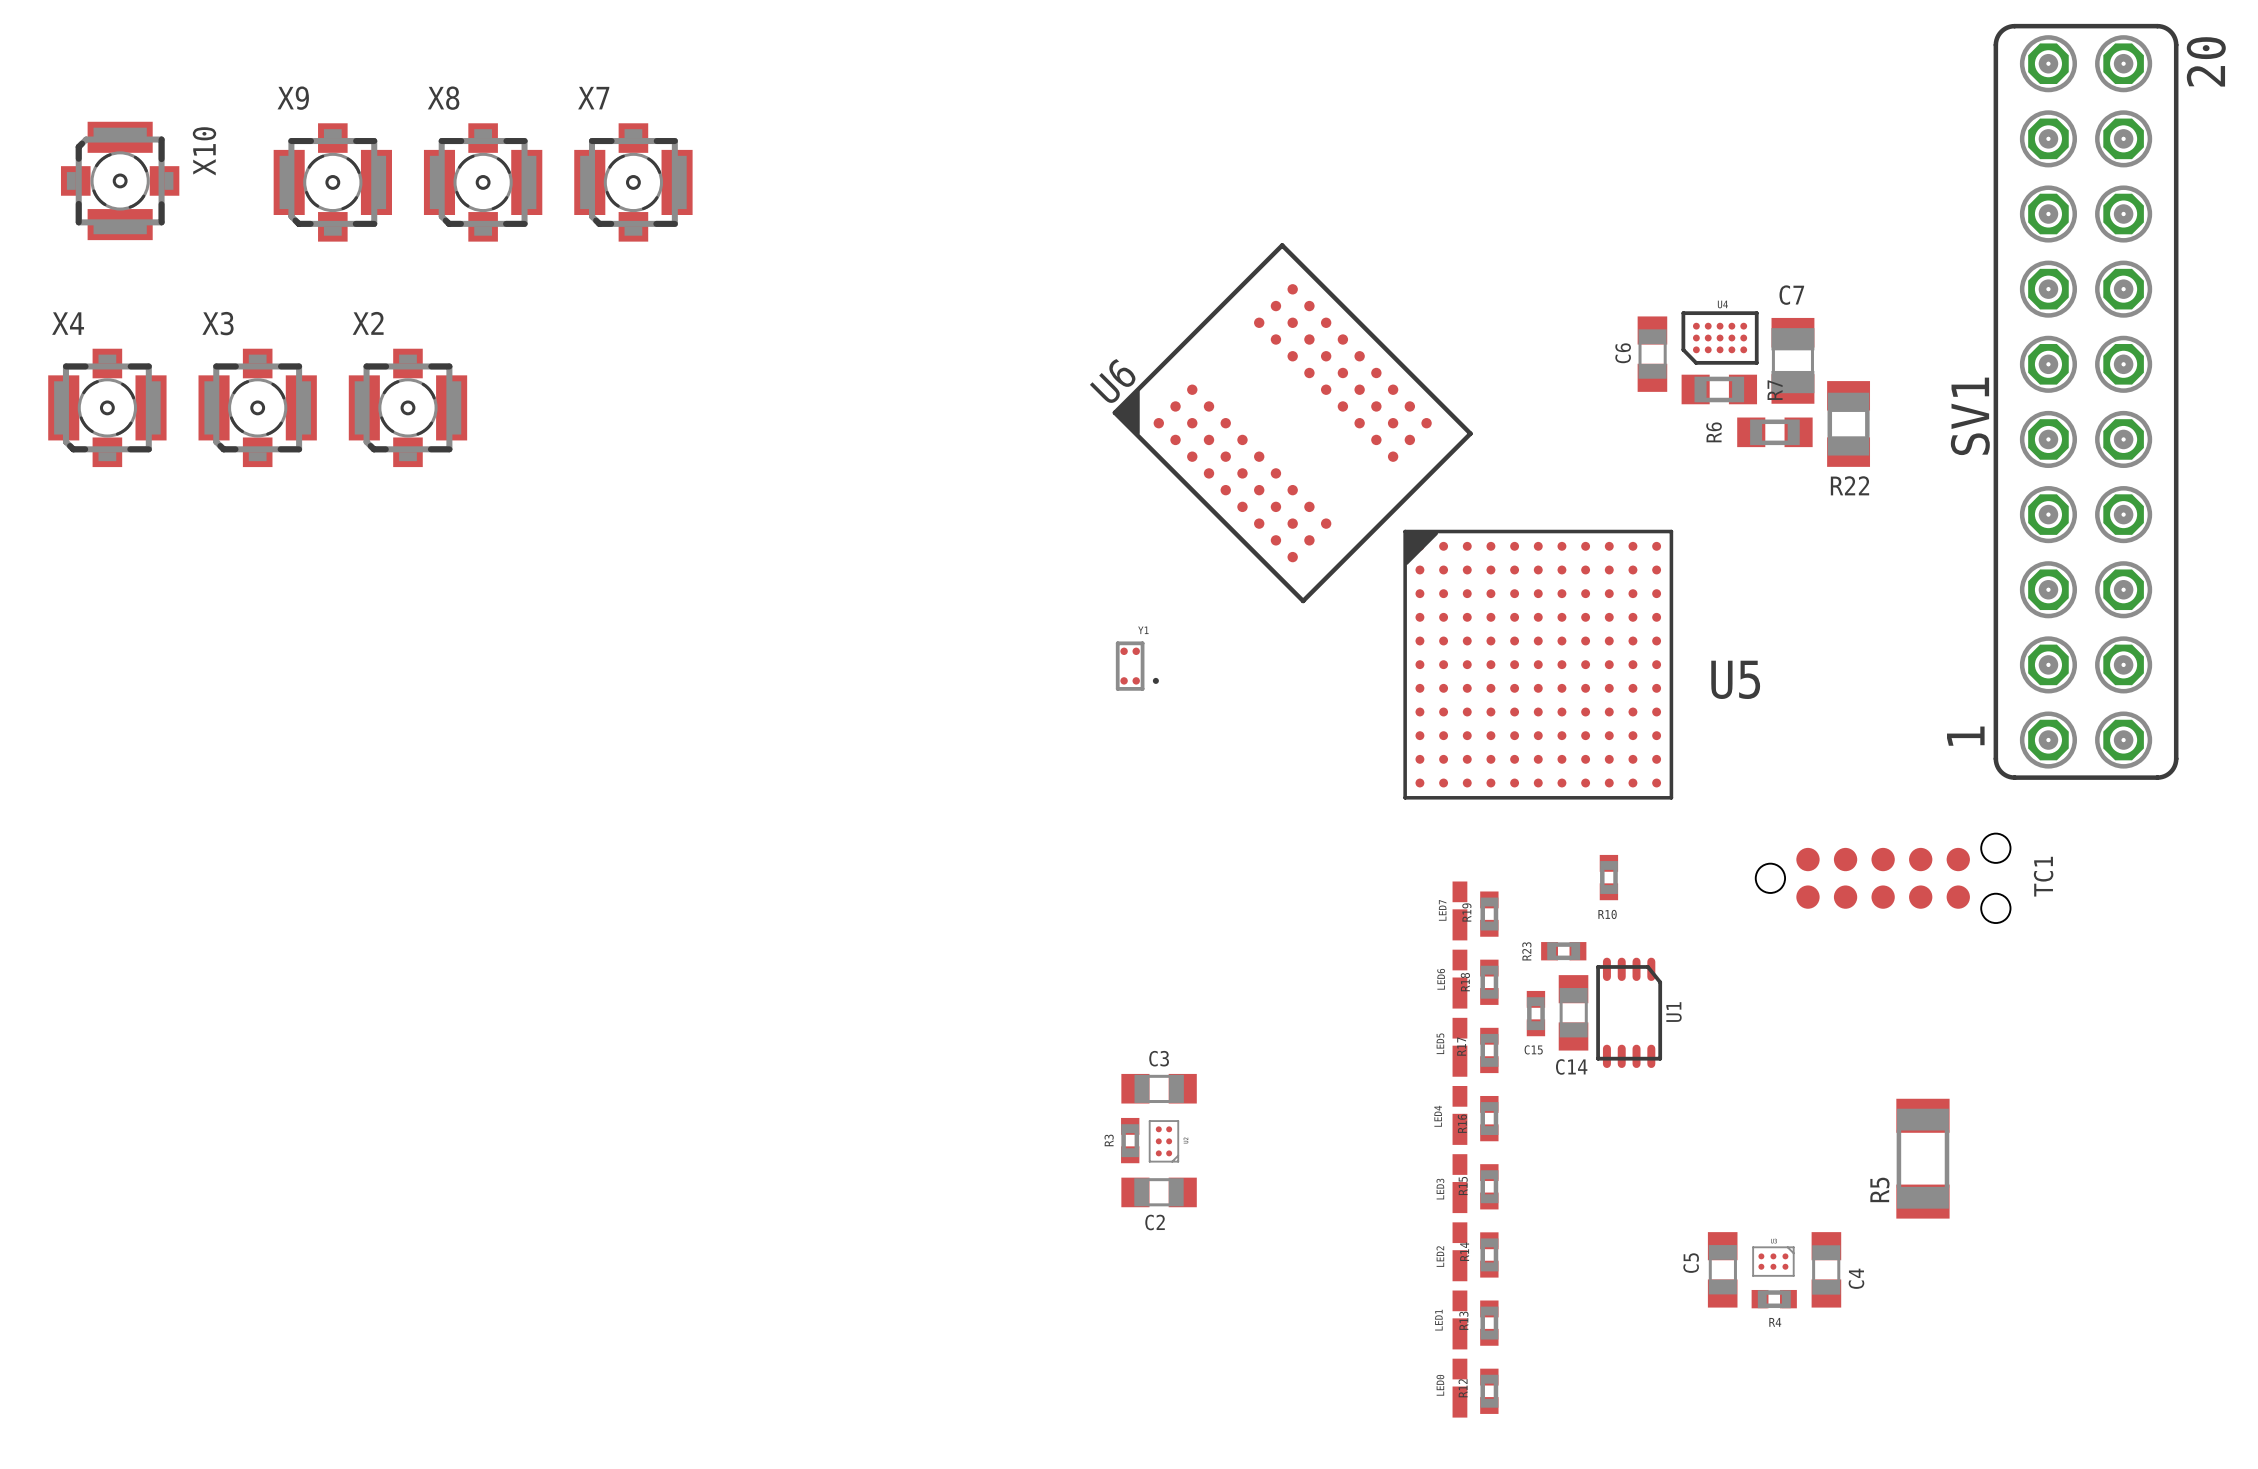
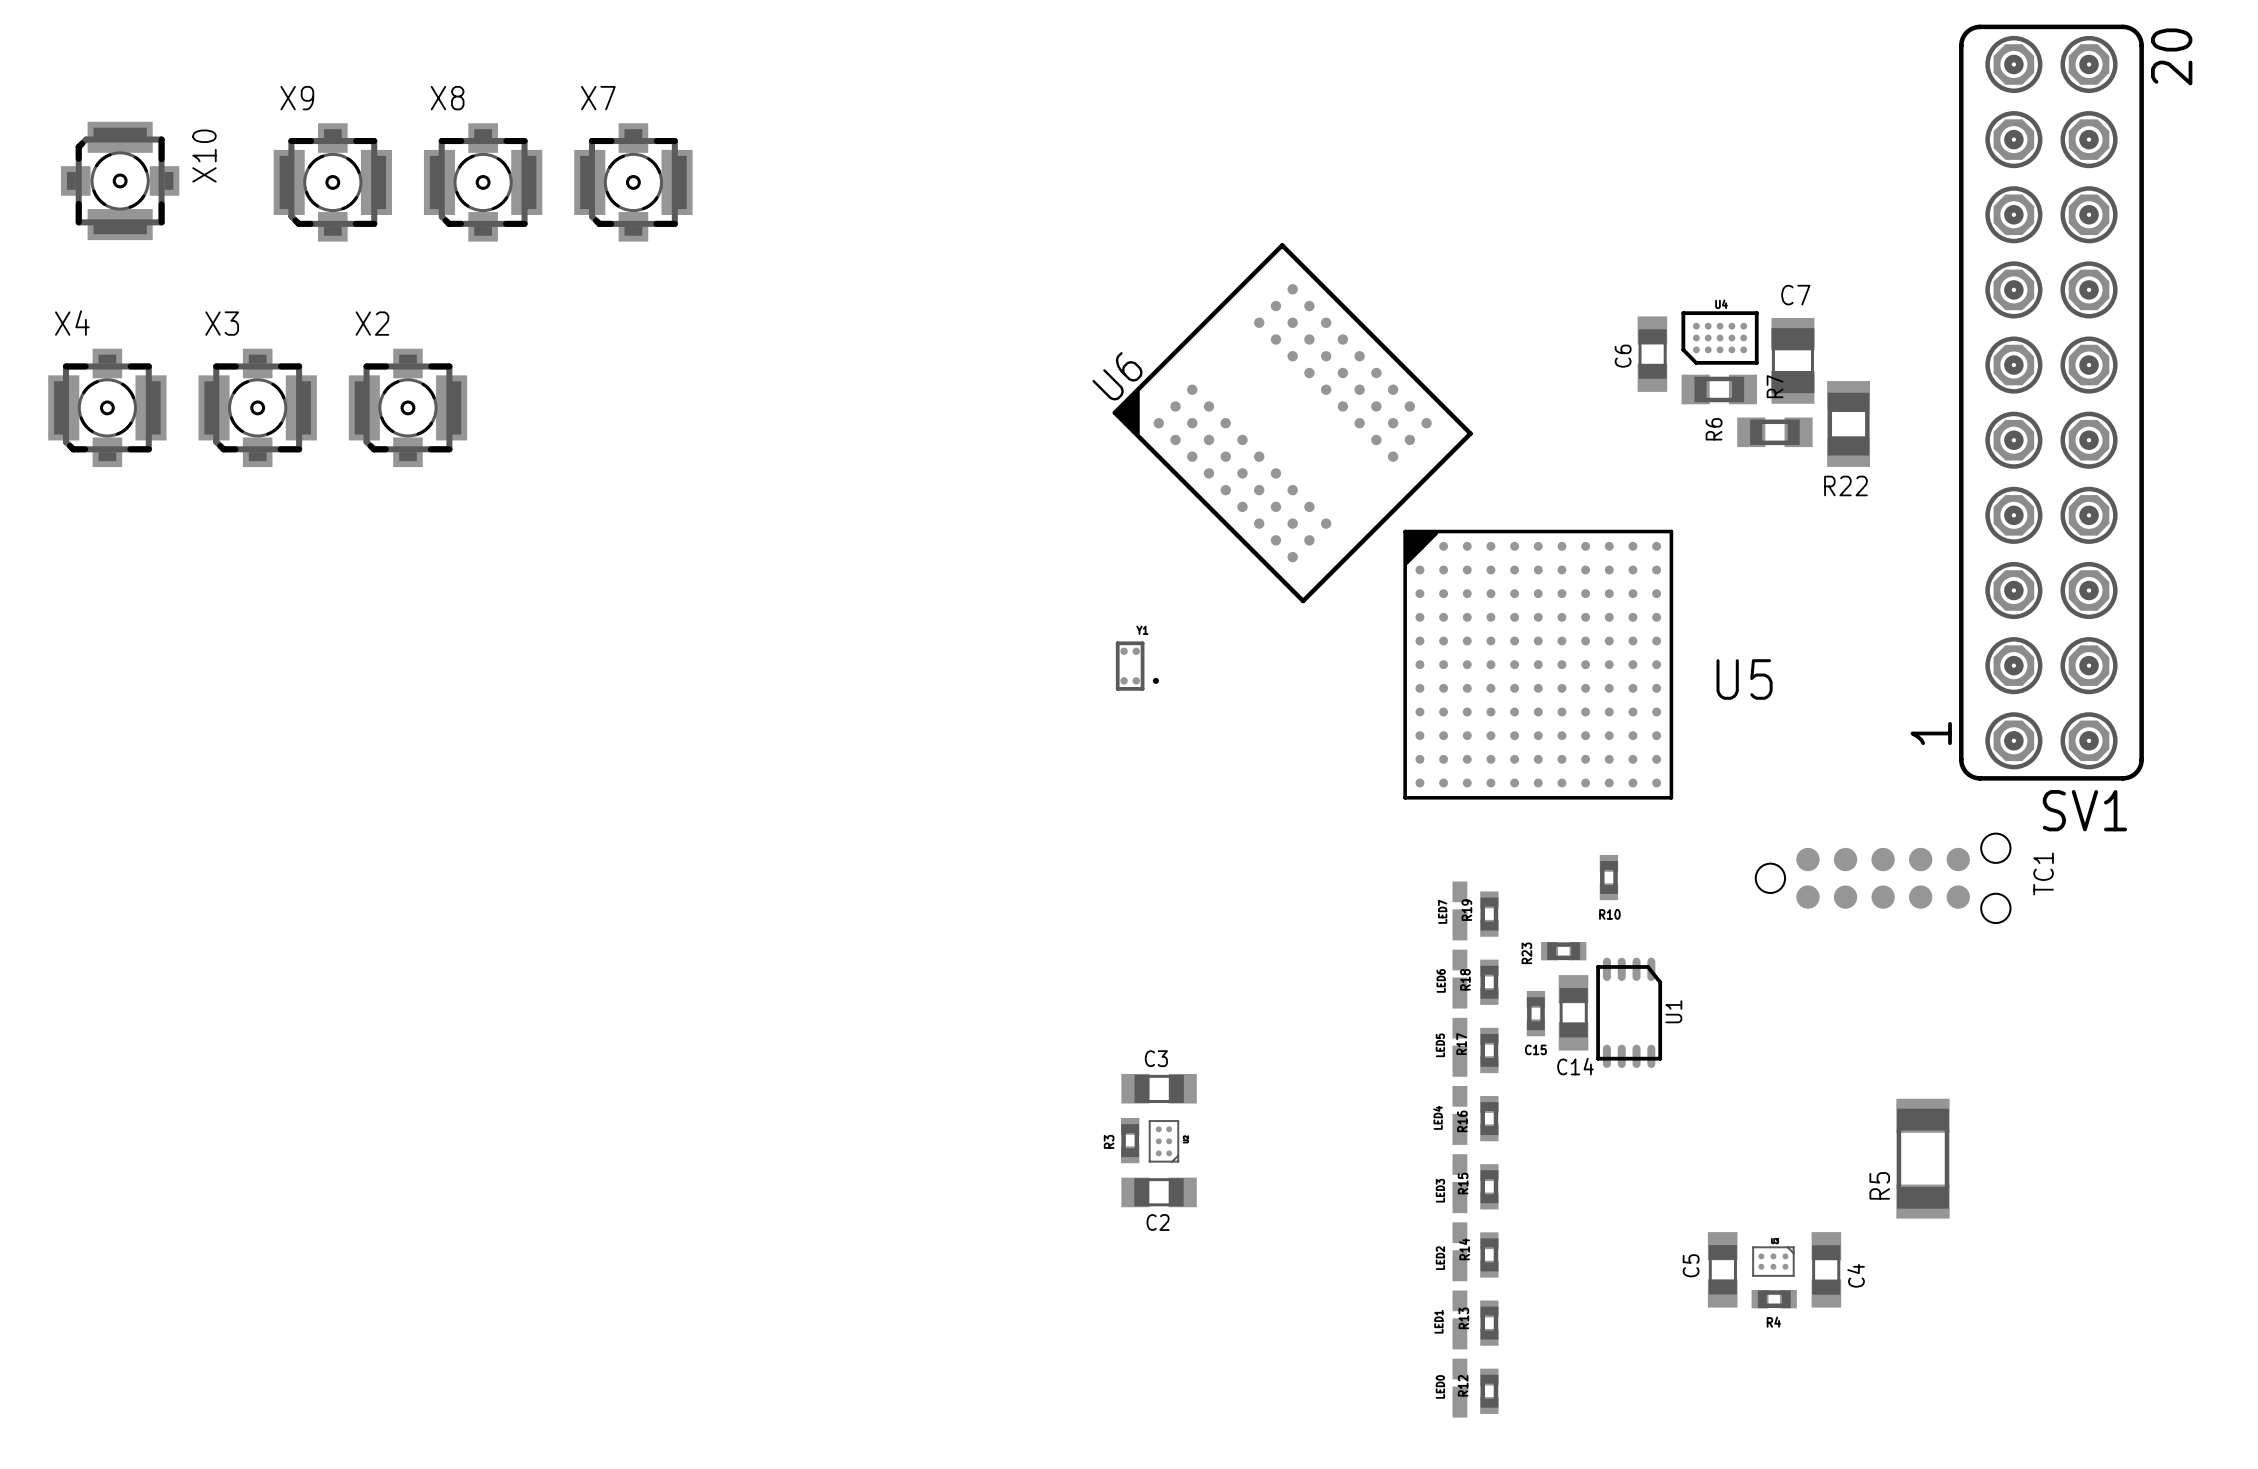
SV1 position: (2086, 401) -> (2051, 402)
SV1 name rotation: 0° (1970, 416) -> 90° clockwise (2084, 810)
SV1 name position: SV1 (1970, 416) -> SV1 (2084, 810)

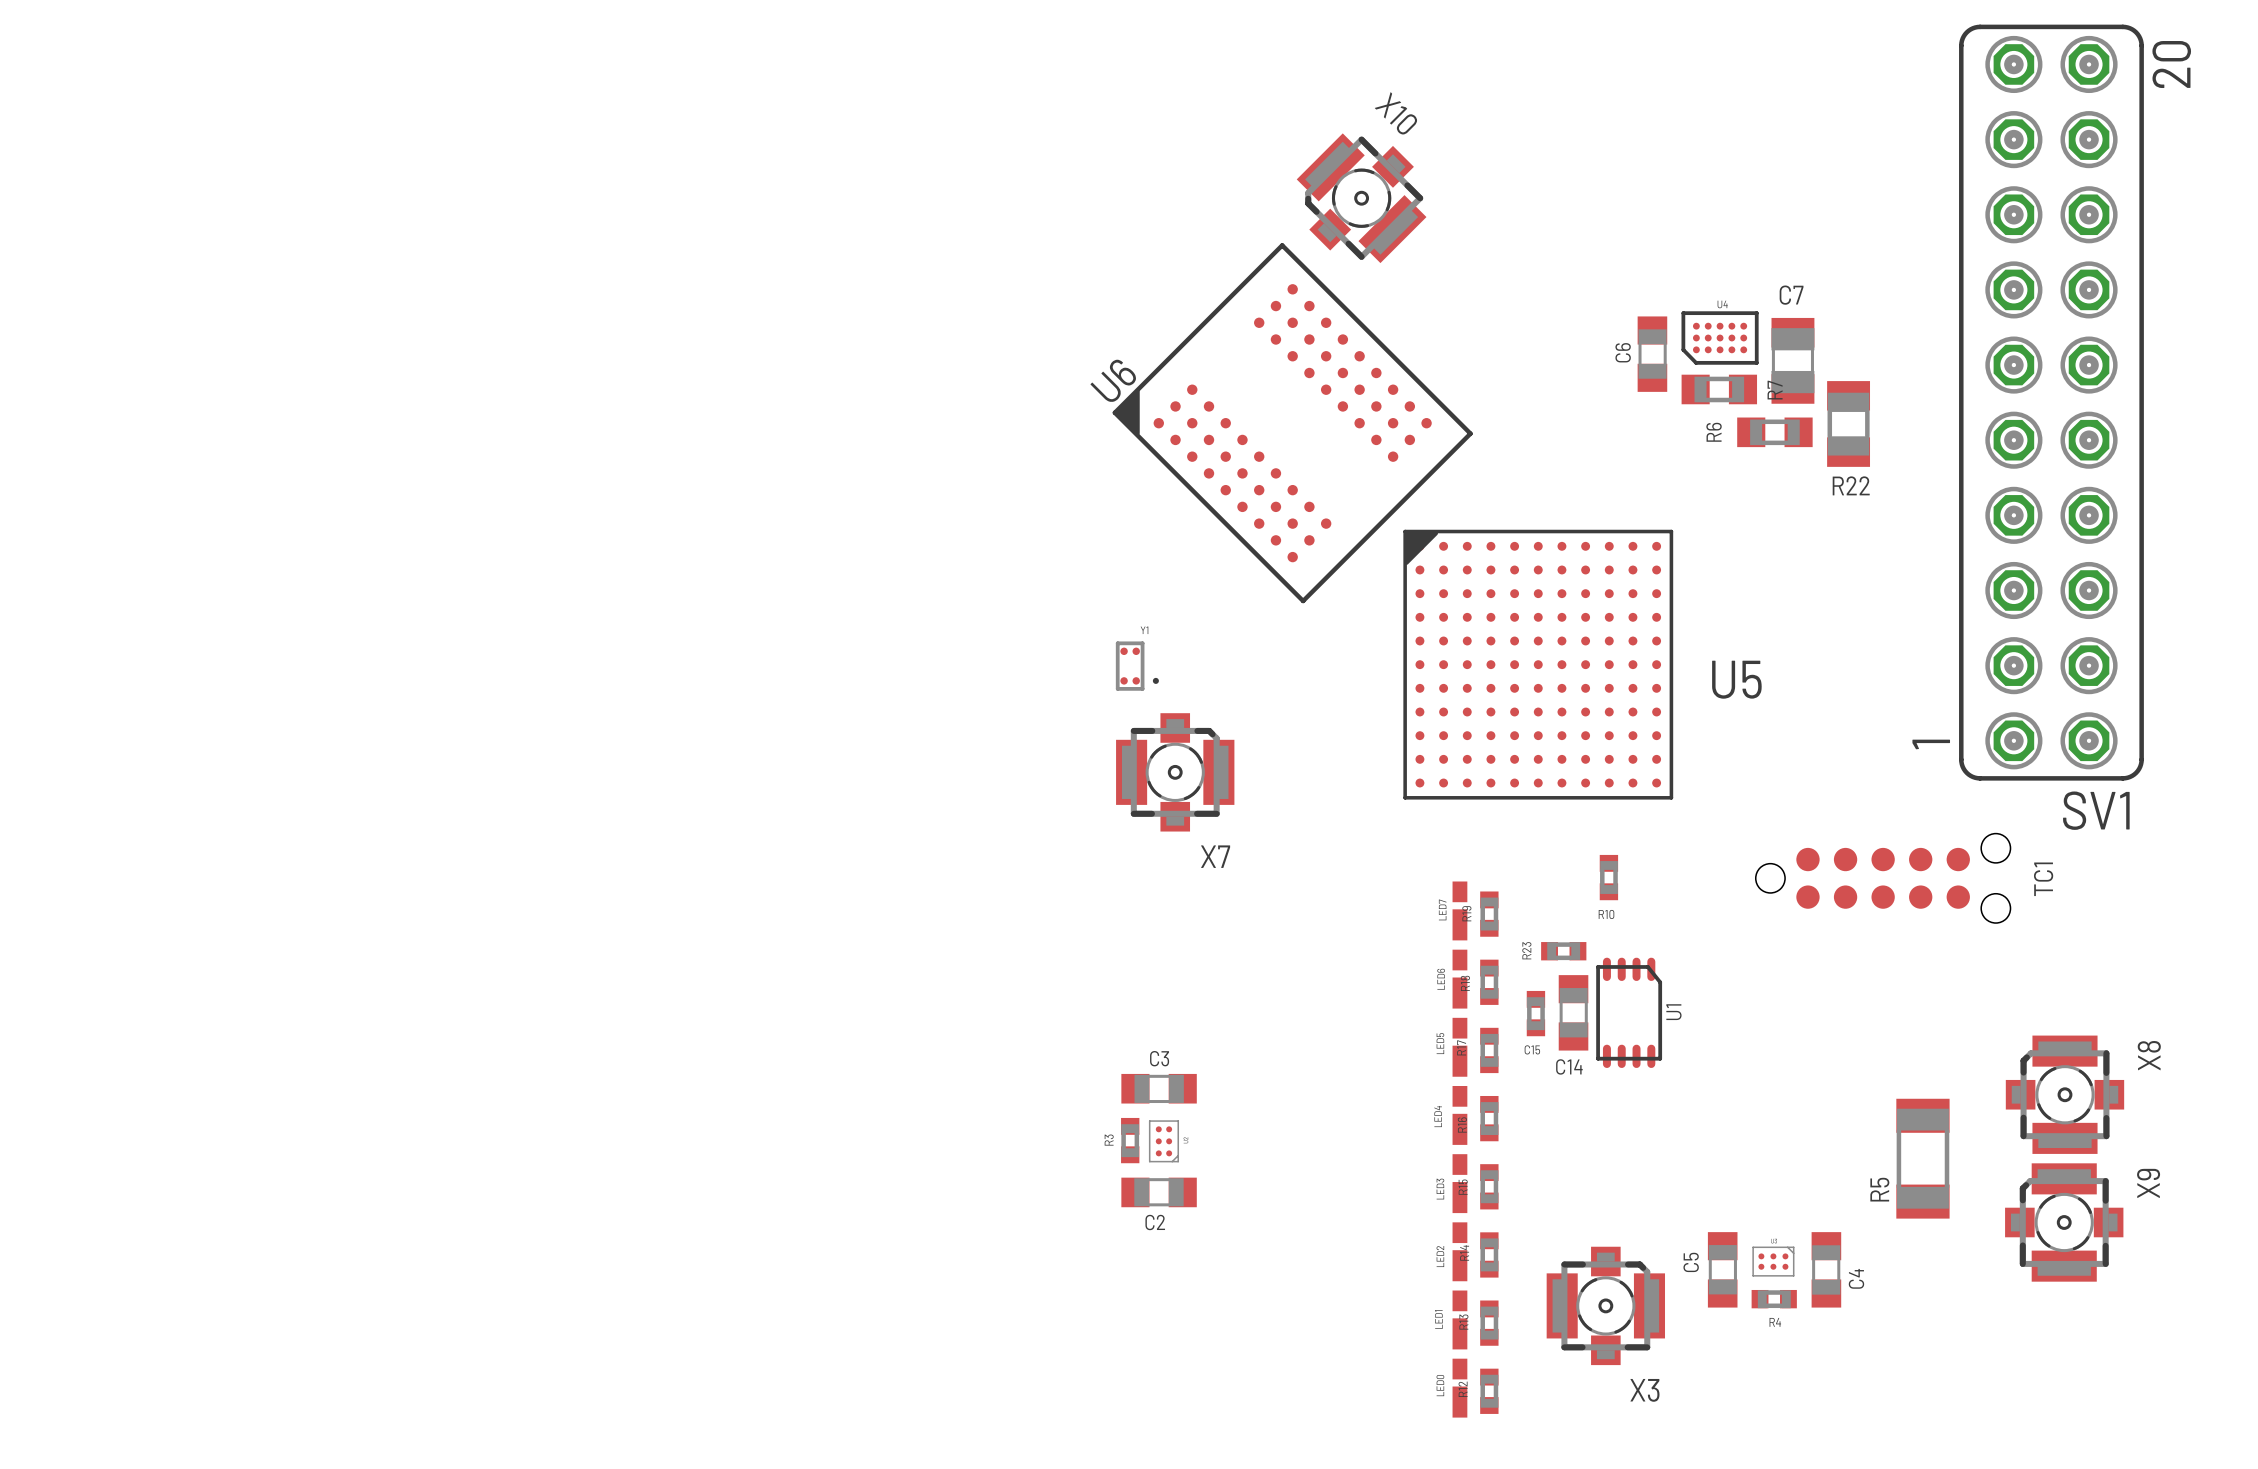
X10 rotation: 0° (120, 180) -> 45° counterclockwise (1361, 198)
X10 position: (120, 180) -> (1361, 198)
X9 rotation: 0° (332, 182) -> 90° clockwise (2064, 1222)
X9 position: (332, 182) -> (2064, 1222)
X8 rotation: 0° (483, 182) -> 90° clockwise (2064, 1094)
X8 position: (483, 182) -> (2064, 1094)
X7 rotation: 0° (633, 182) -> 180° (1175, 772)
X7 position: (633, 182) -> (1175, 772)
X4: (107, 407) -> none
X3 rotation: 0° (257, 407) -> 180° (1605, 1305)
X3 position: (257, 407) -> (1605, 1305)
X2: (407, 407) -> none

